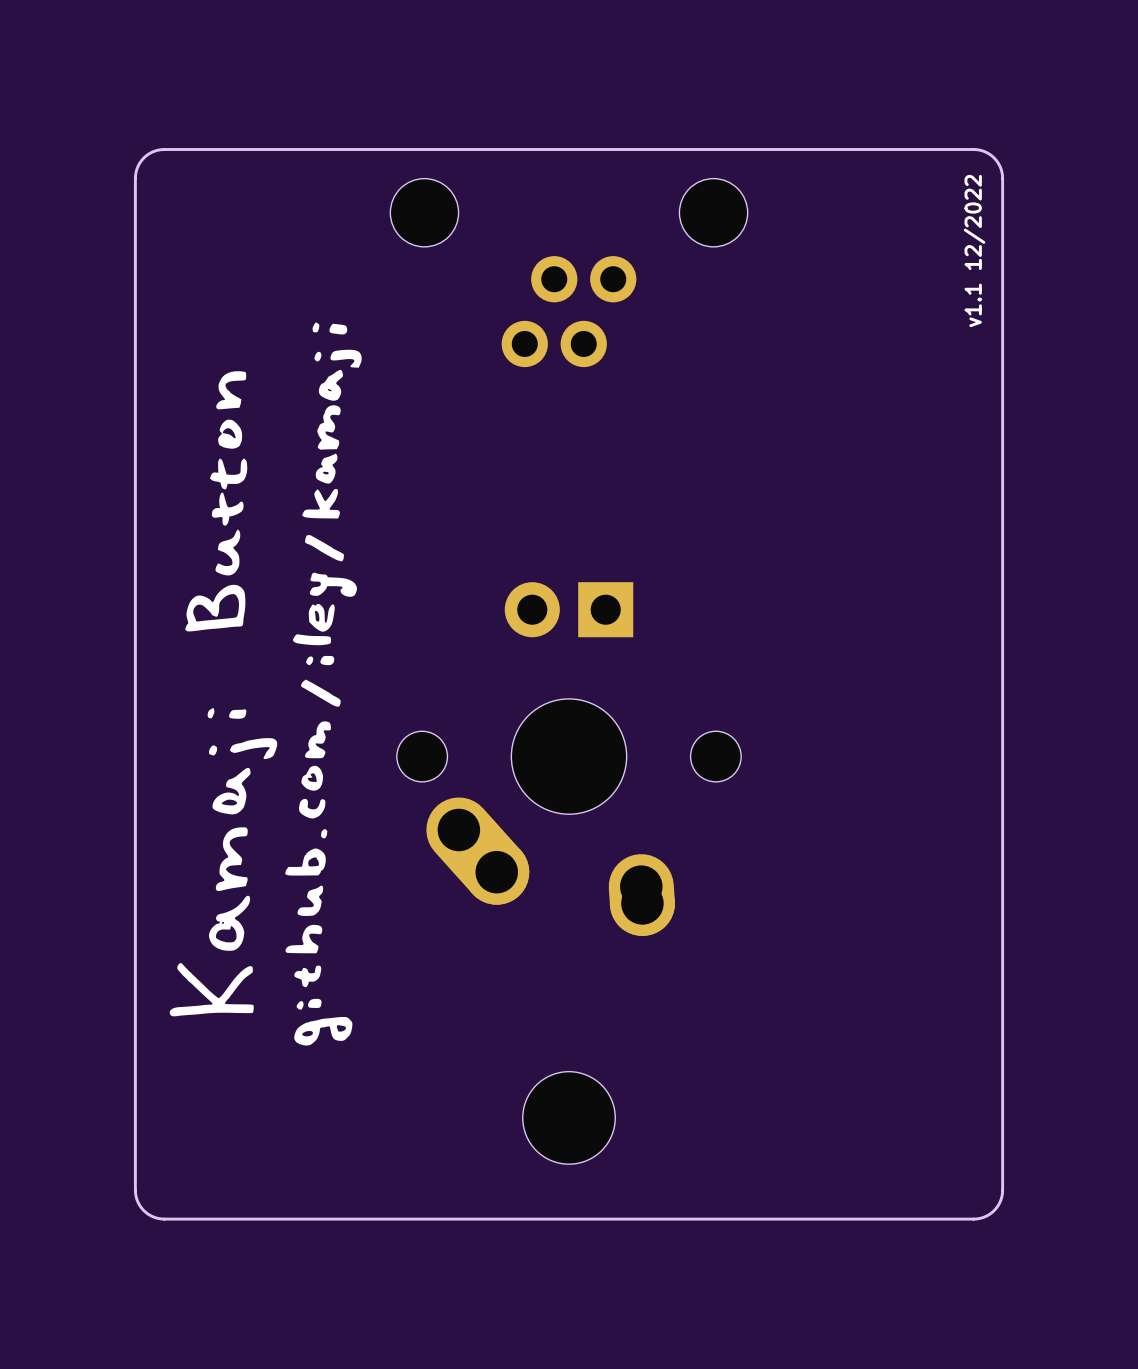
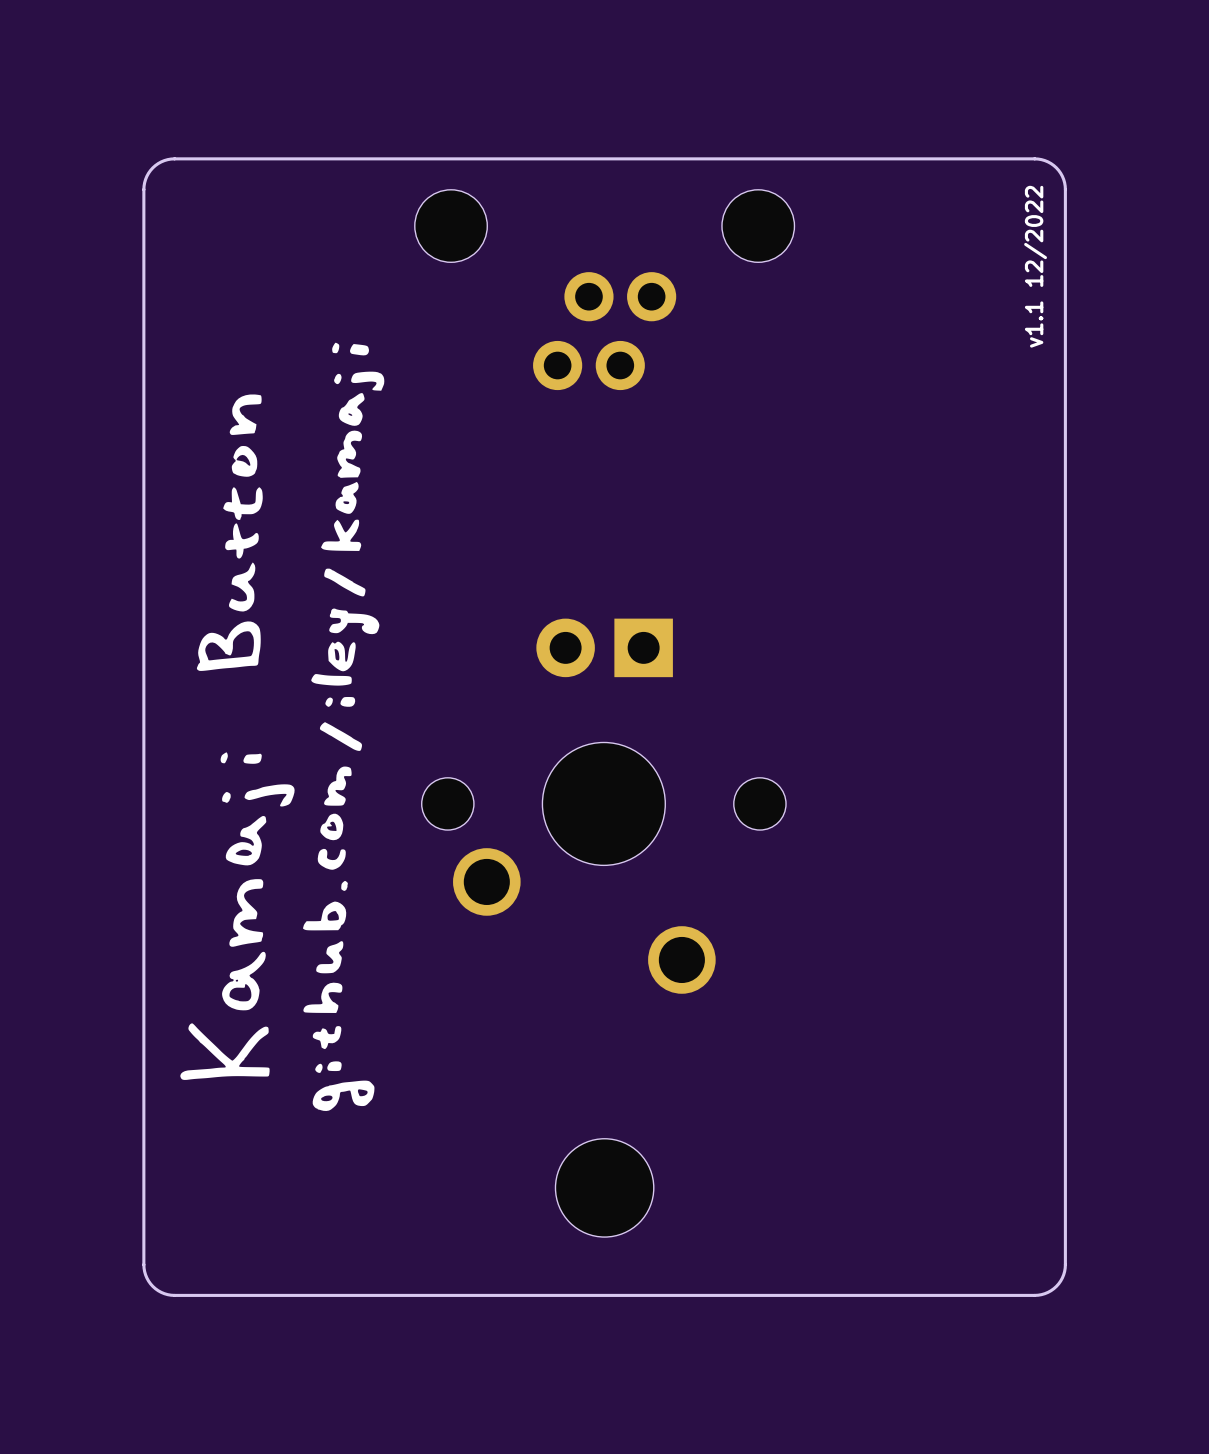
part footprint: [396, 582, 742, 936] -> [421, 618, 787, 994]

